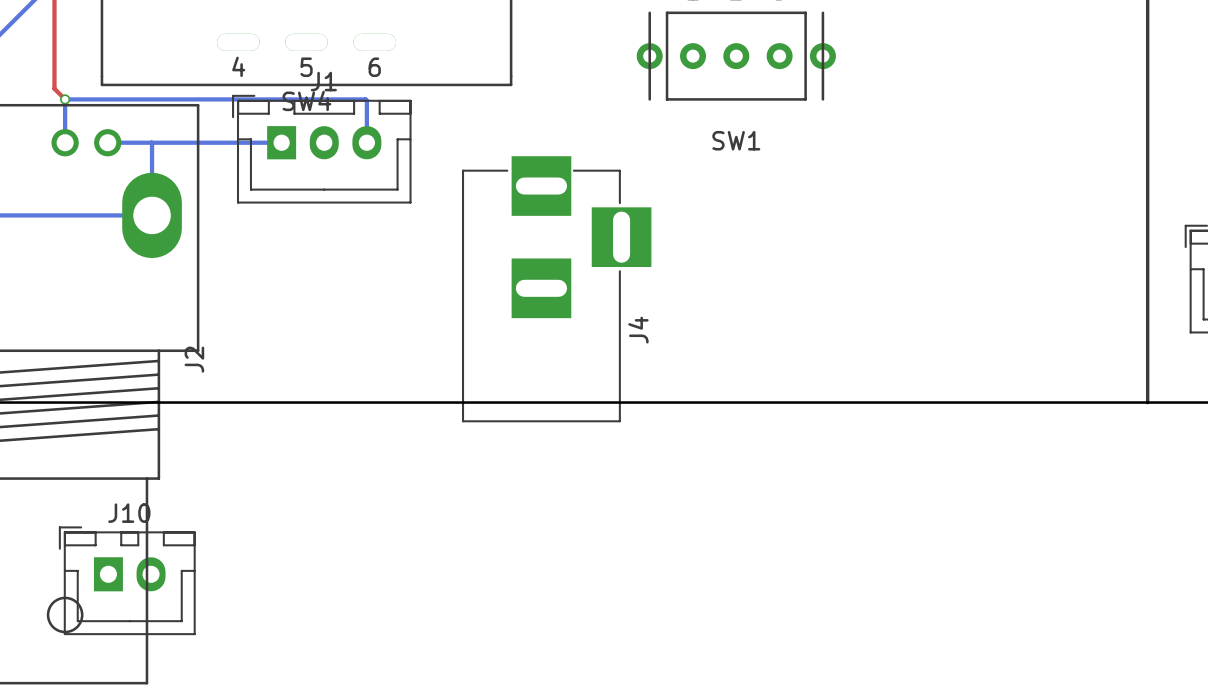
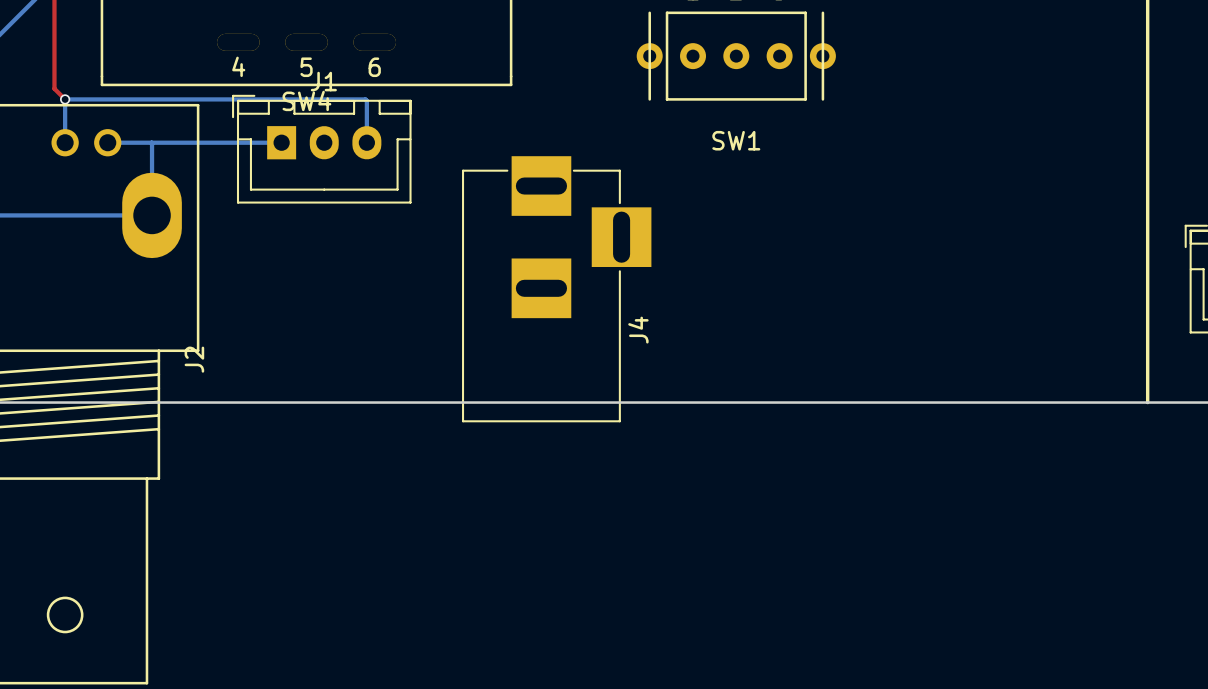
J10: (127, 580) -> none

